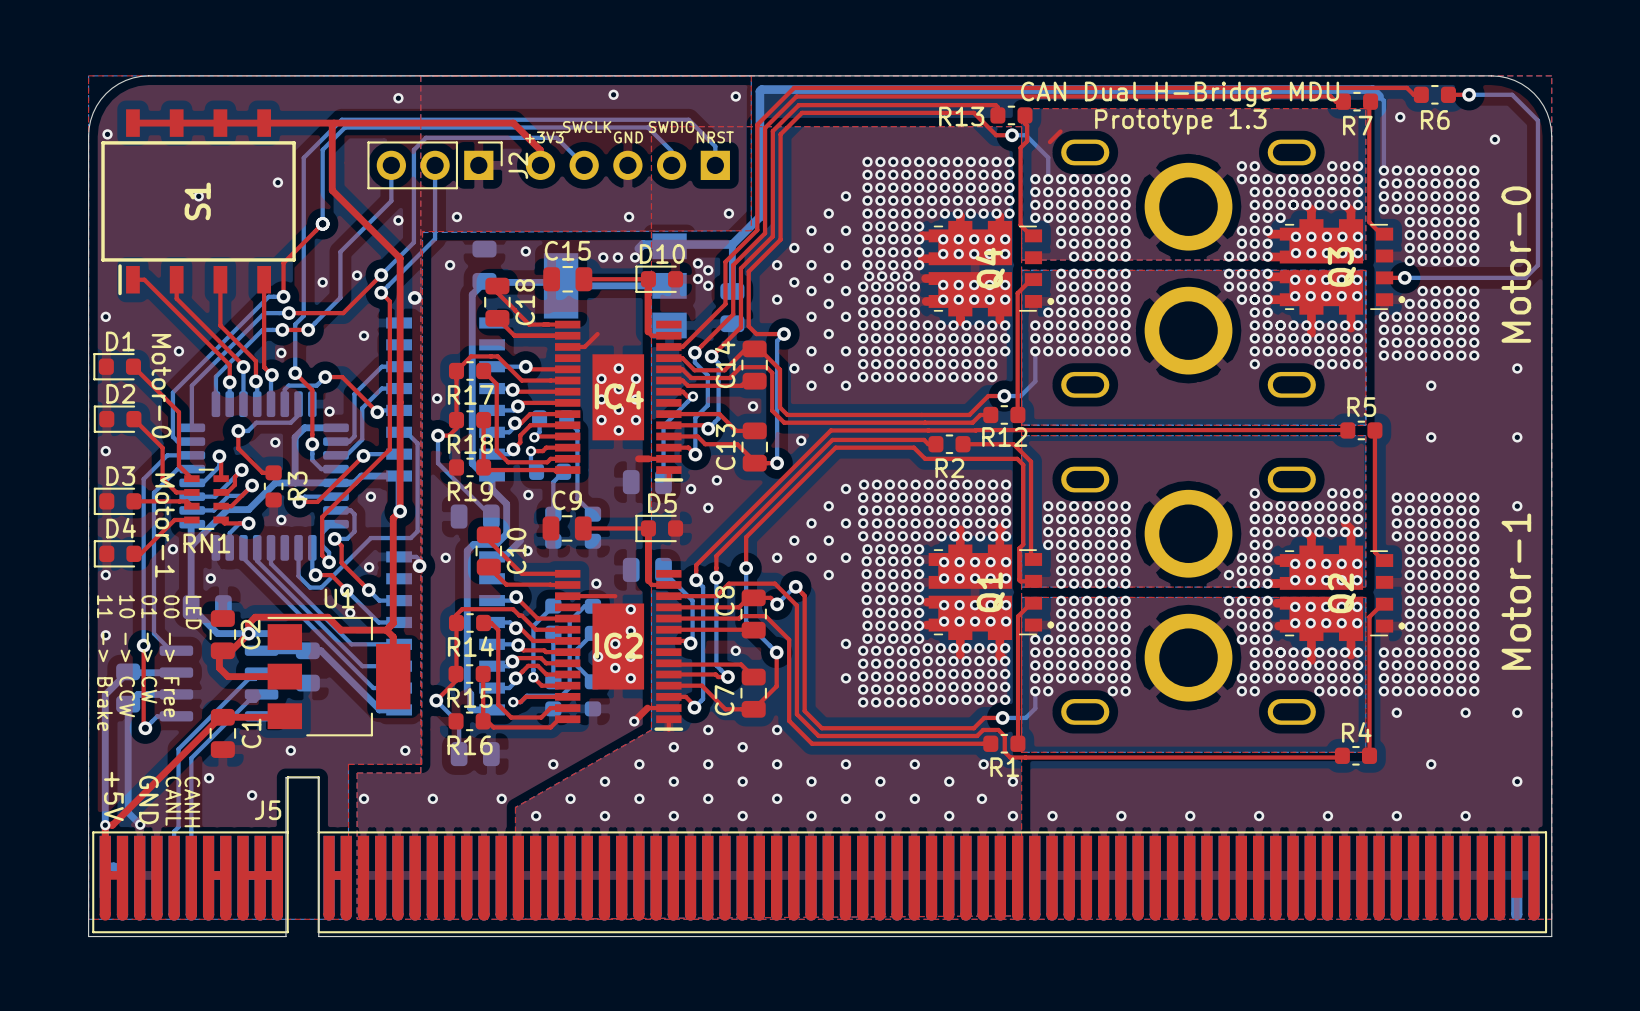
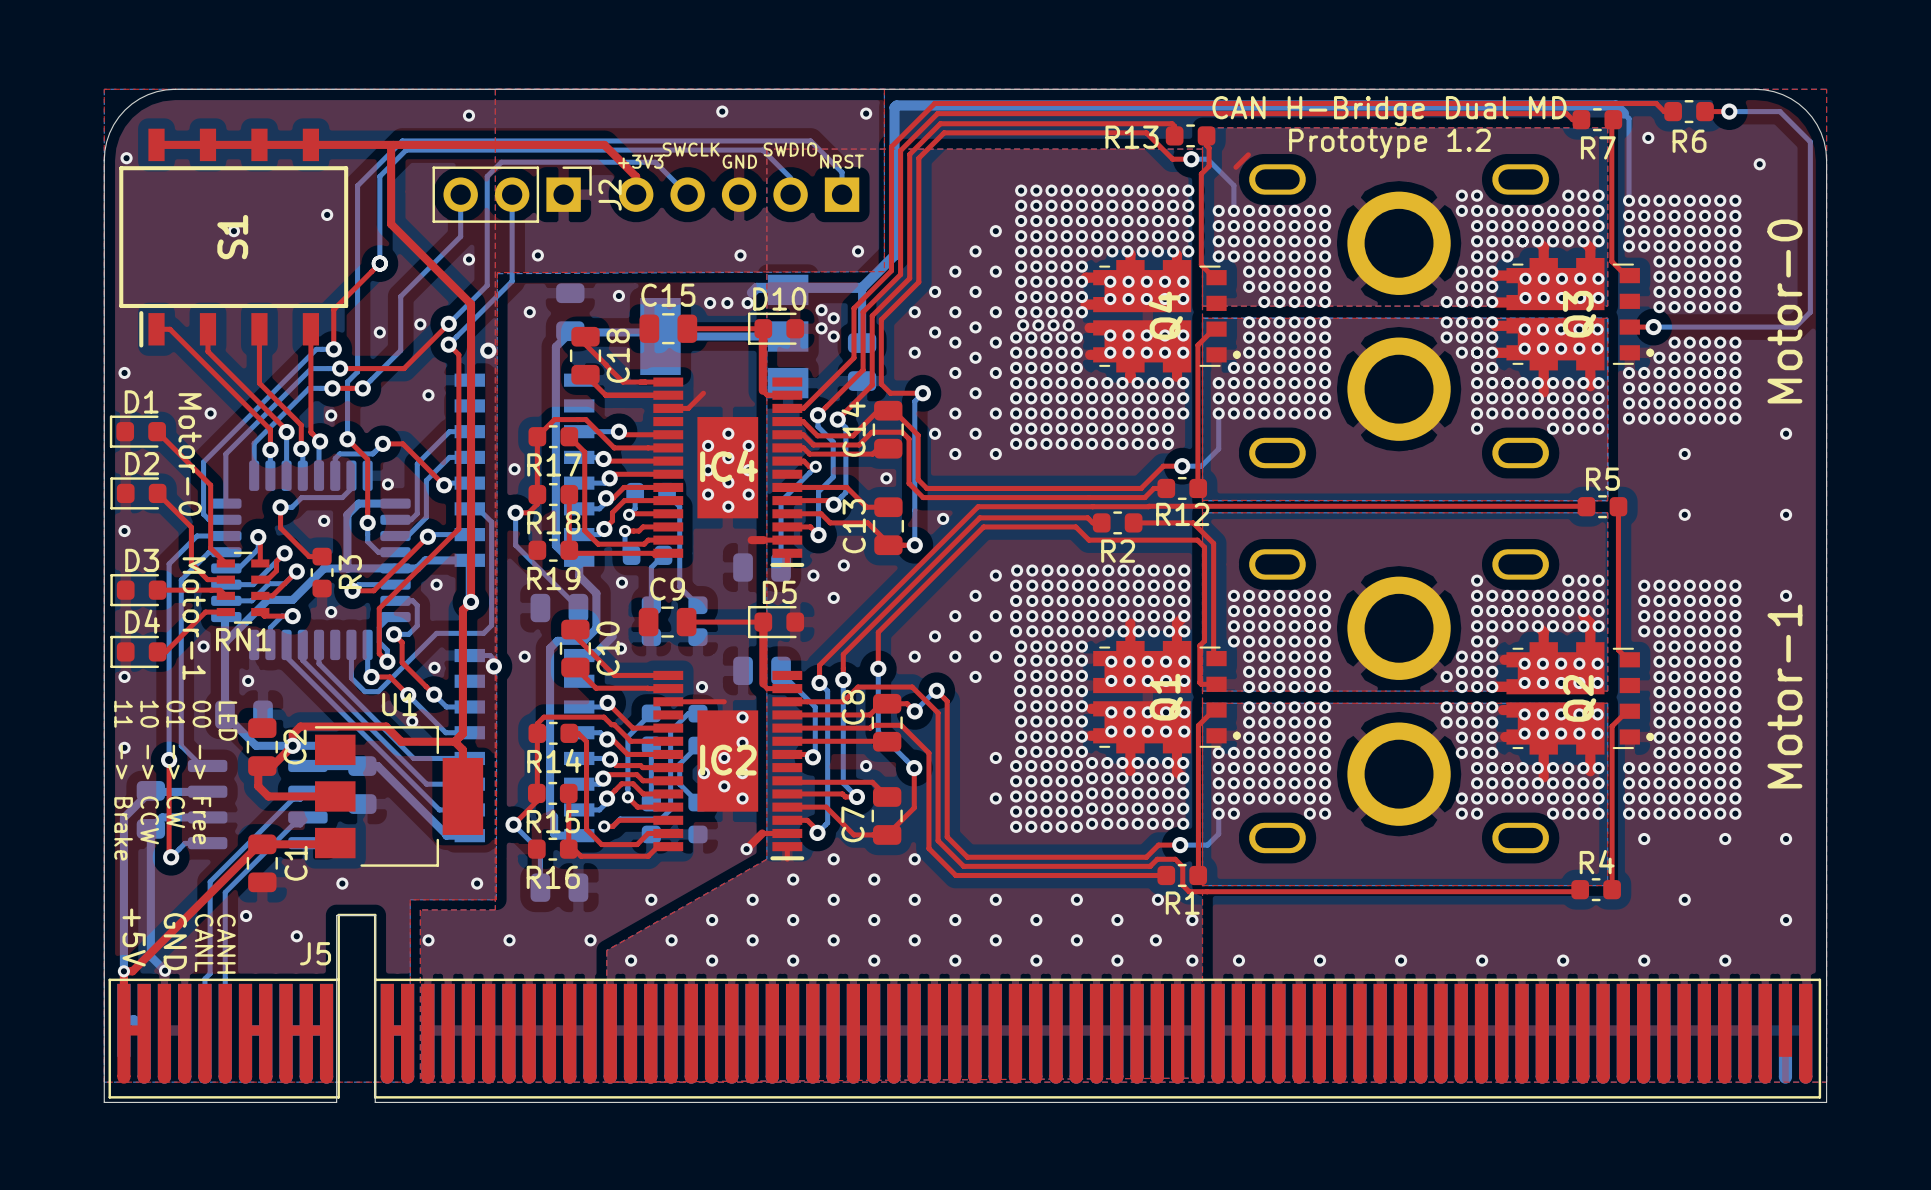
text: CAN Dual H-Bridge MDU (1180, 94) -> CAN H-Bridge Dual MD (1389, 111)
text: Prototype 1.3 (1180, 122) -> Prototype 1.2 (1390, 143)

